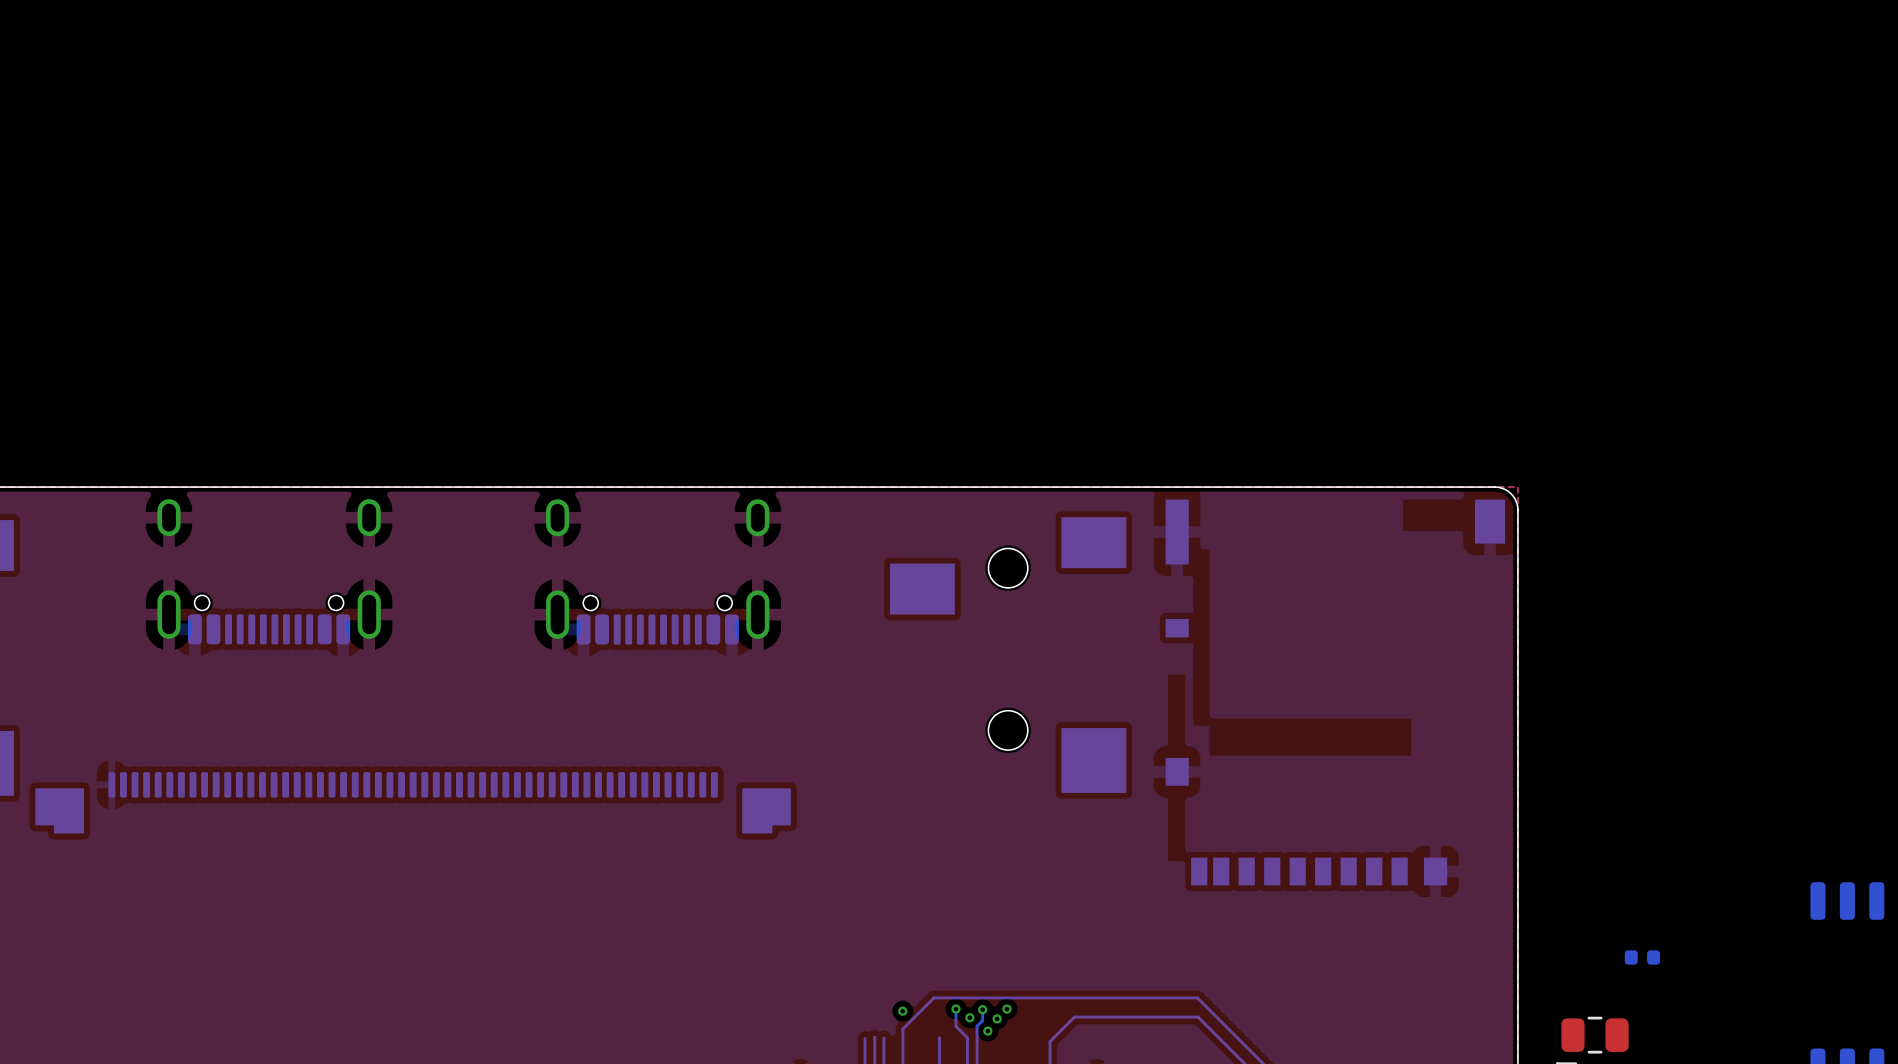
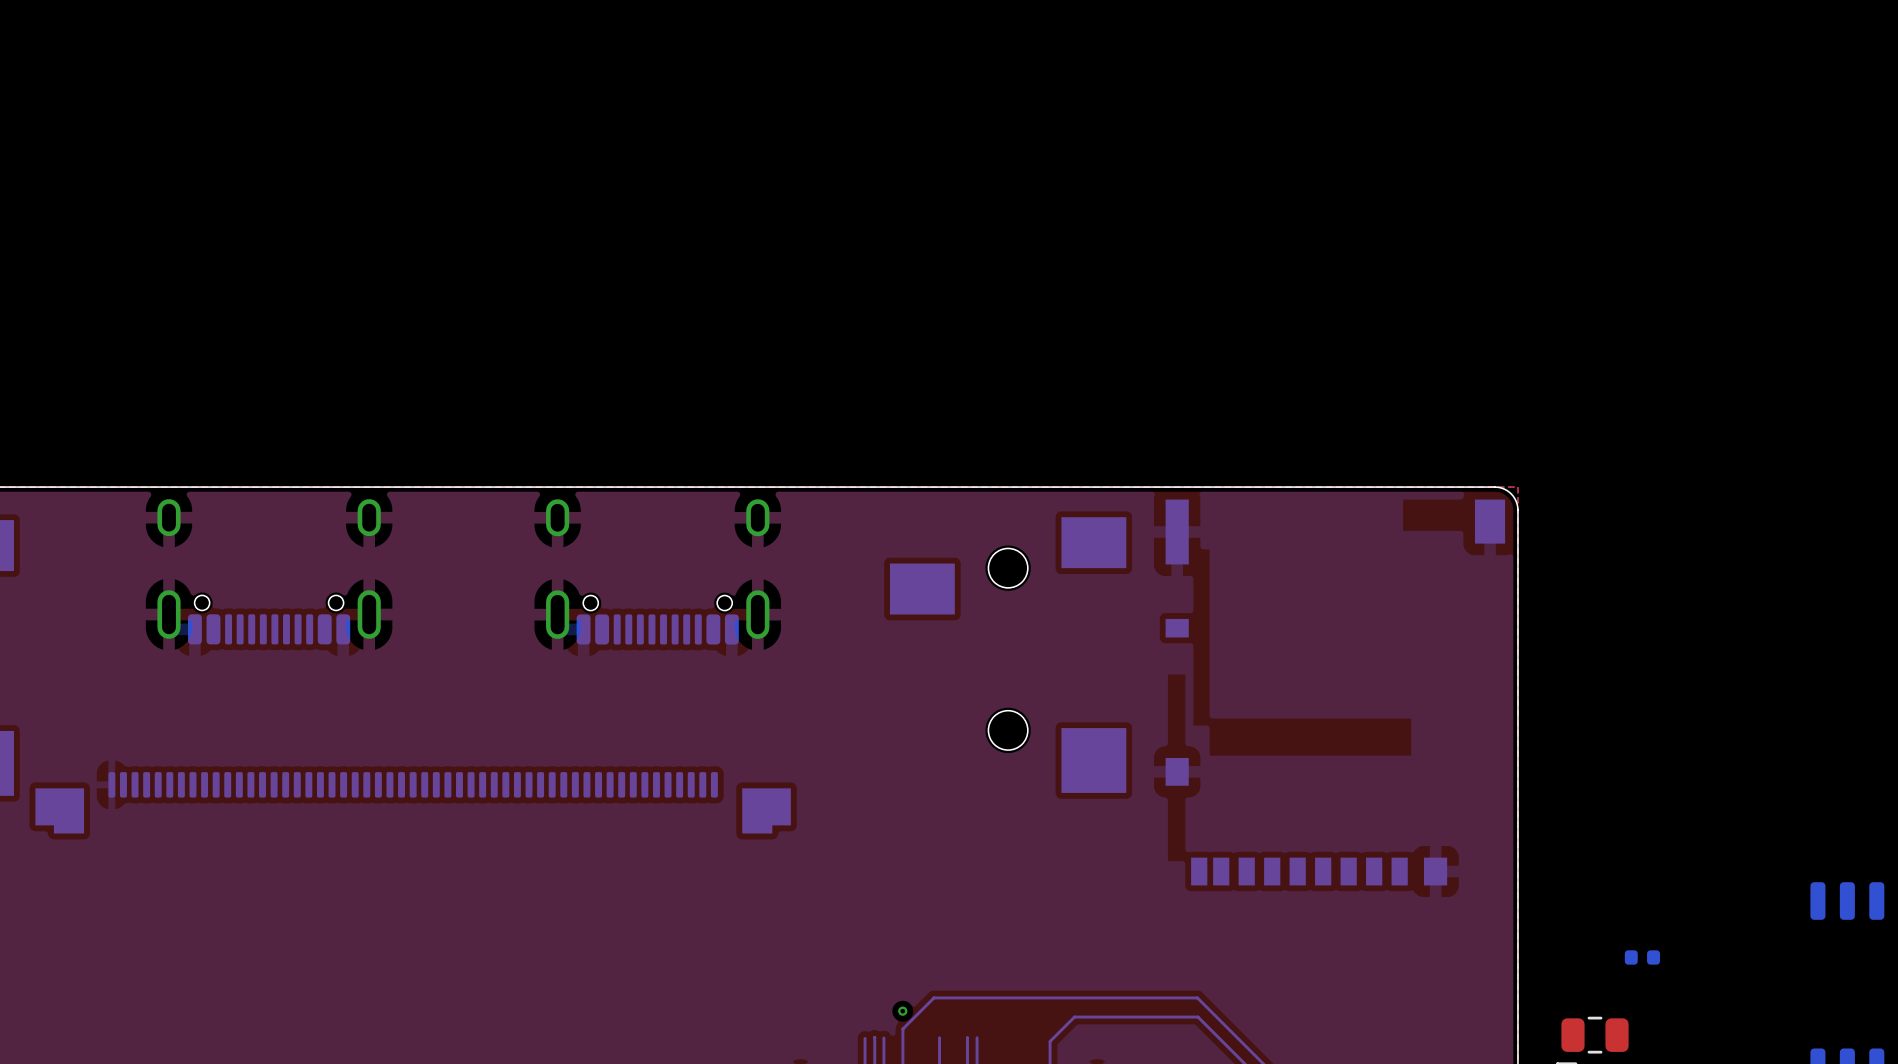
bottom track: (982, 1007) (982, 1020) (977, 1026) (977, 1037) -> none
bottom track: (955, 1009) (955, 1026) (967, 1037) -> none
via: (955, 1009) -> none
via: (982, 1009) -> none
via: (1006, 1009) -> none
via: (969, 1017) -> none
via: (997, 1018) -> none
via: (987, 1031) -> none

